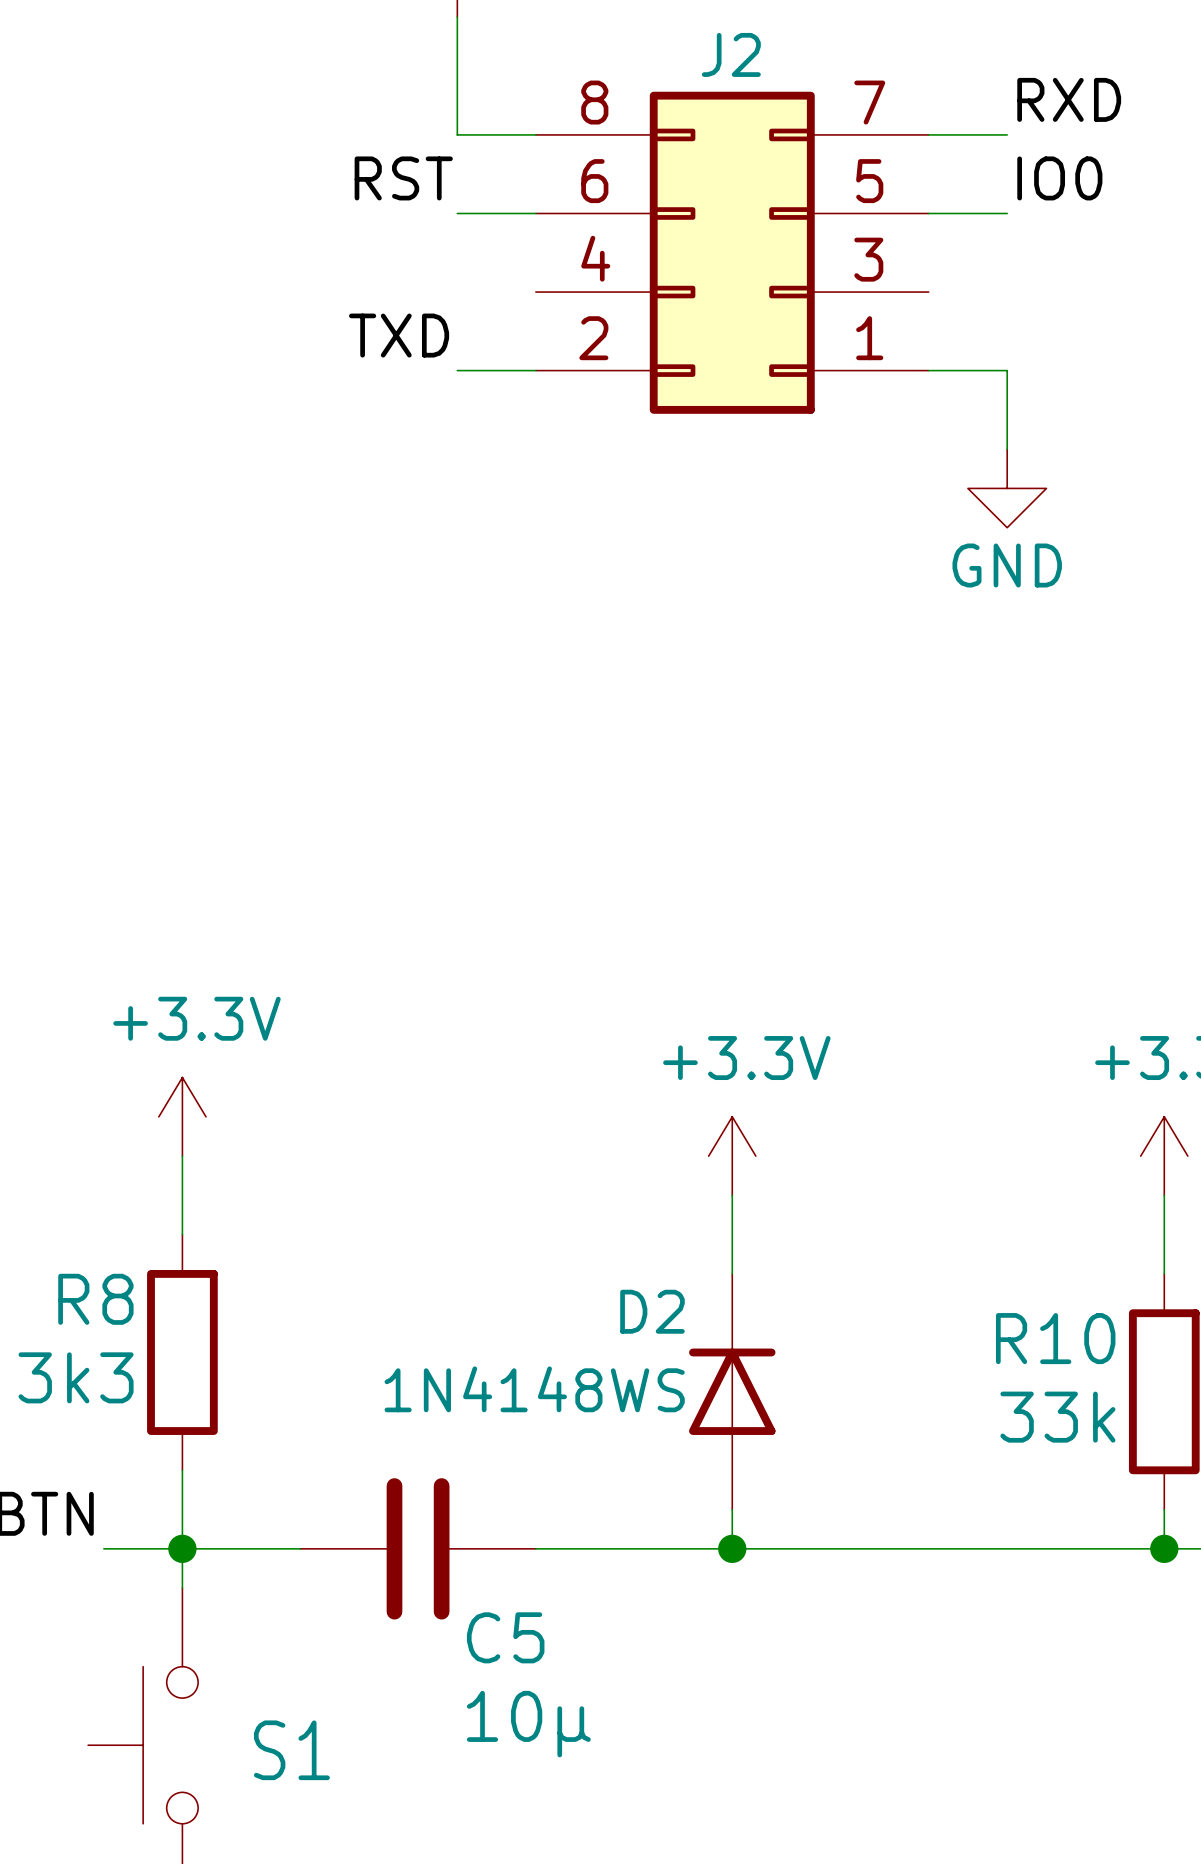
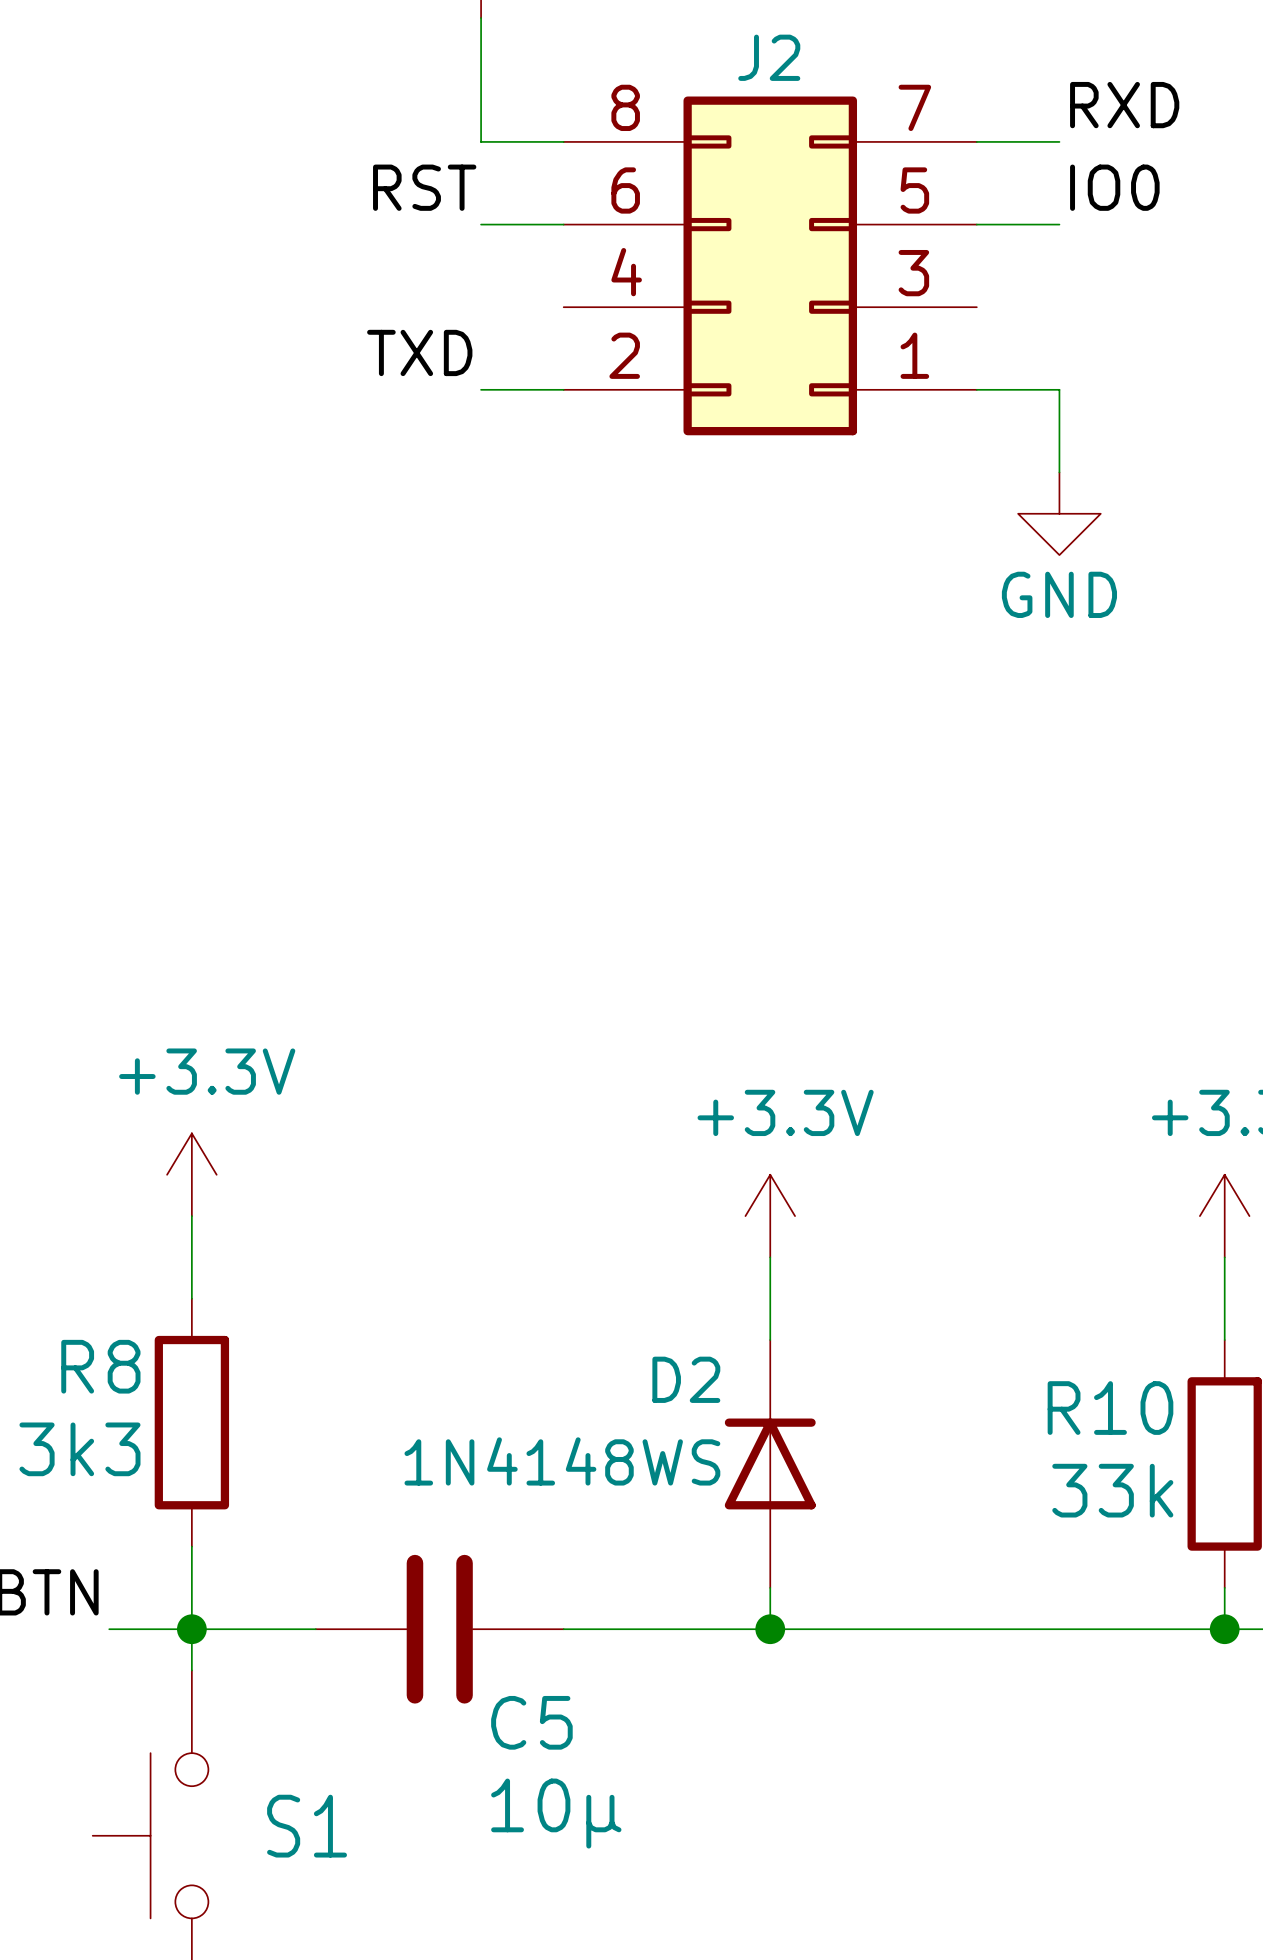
S1 name position: S1 (291, 1750) -> S1 (307, 1826)

